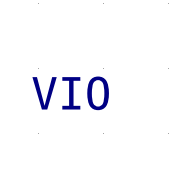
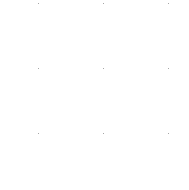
text: VIO (70, 93) -> none

